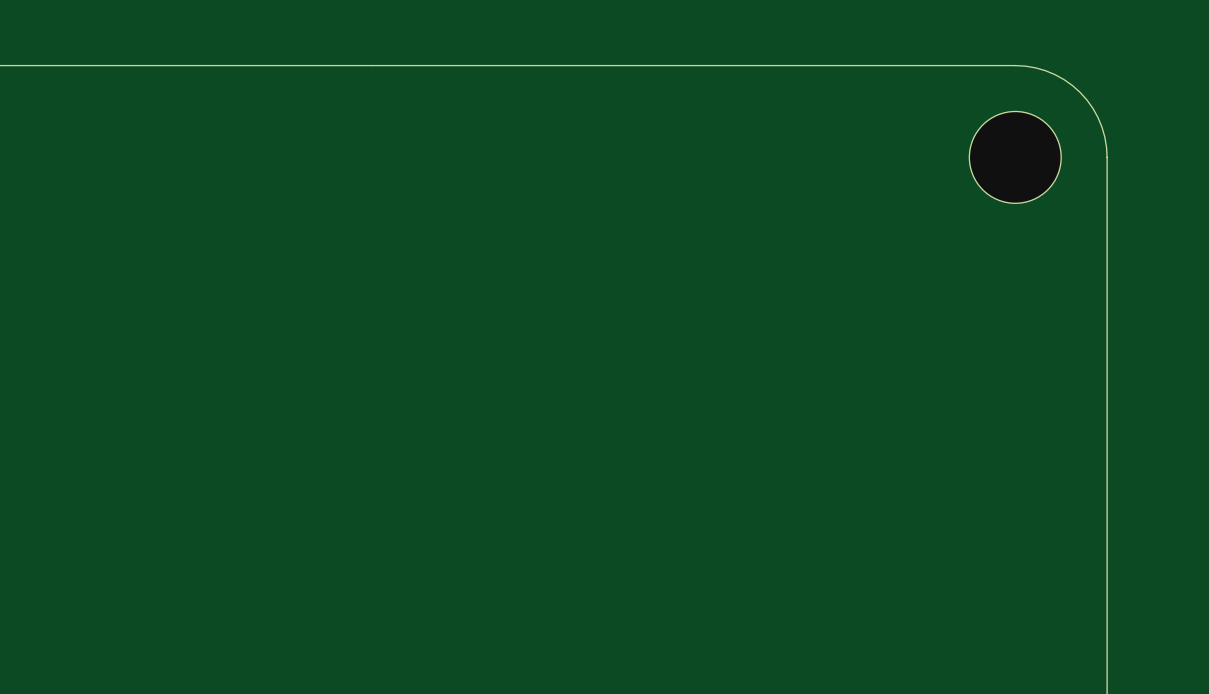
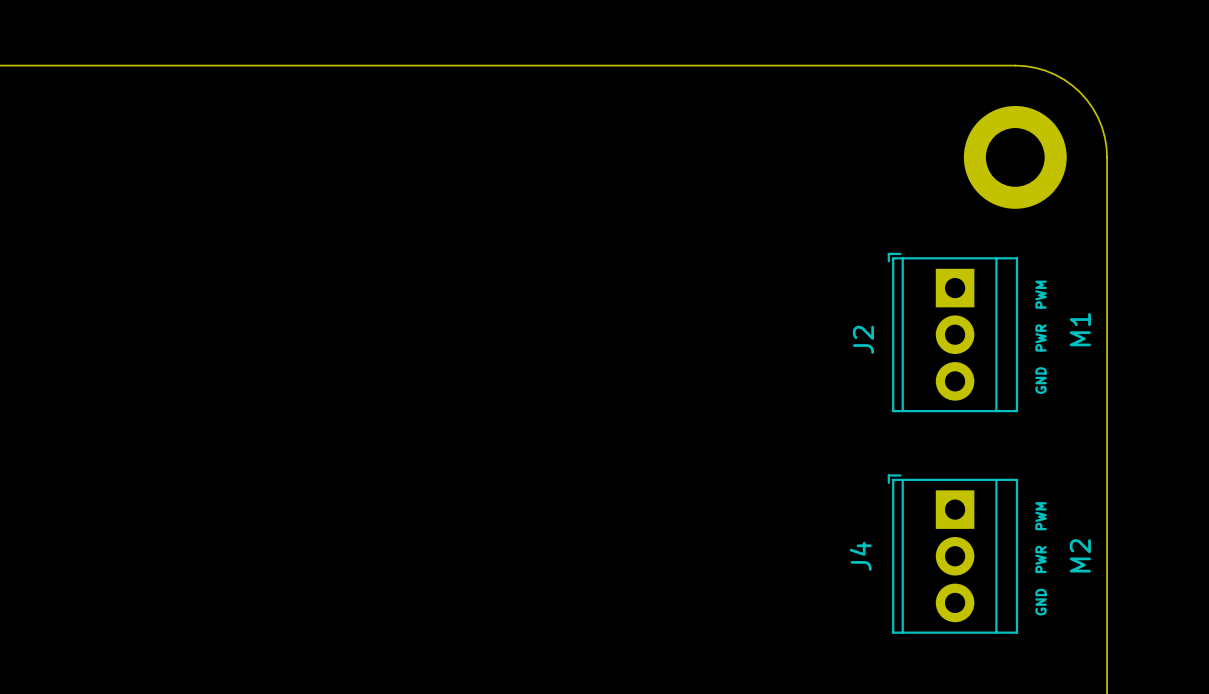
part footprint: [969, 111, 1062, 204] -> [963, 105, 1067, 209]
text: none -> M1 (1080, 329)
J2: none -> (952, 332)
text: none -> GND PWR PWM (1041, 337)
J4: none -> (952, 554)
text: none -> M2 (1080, 555)
text: none -> GND PWR PWM (1041, 558)

